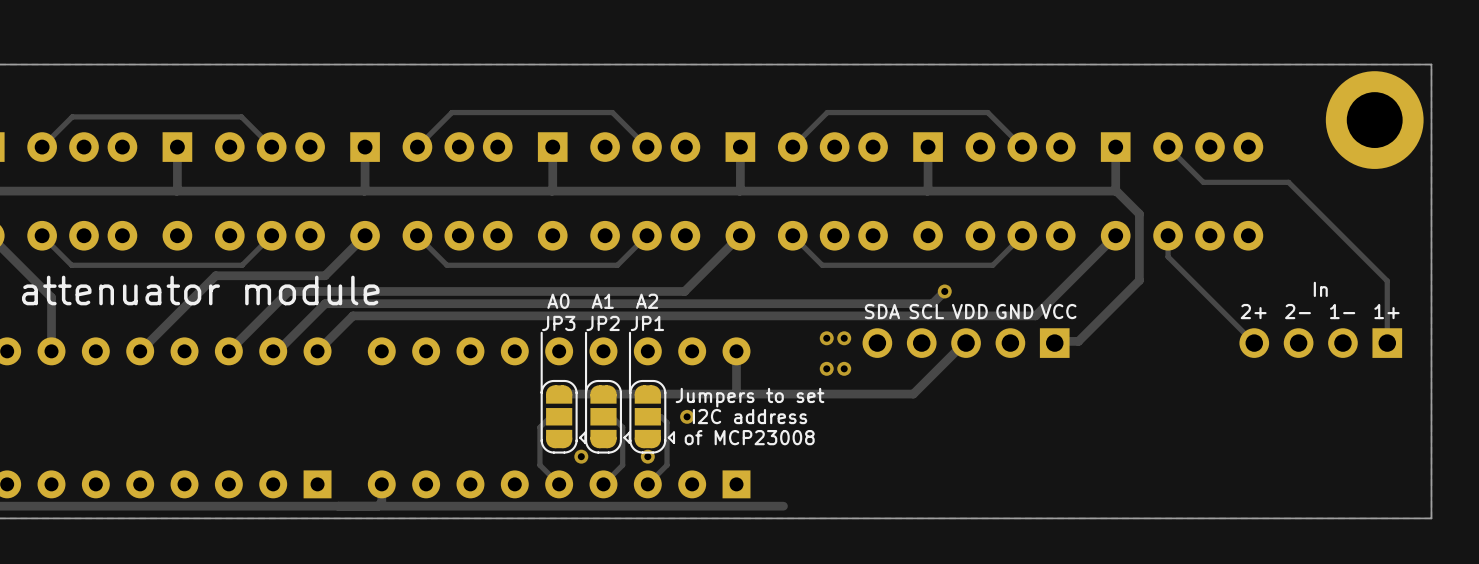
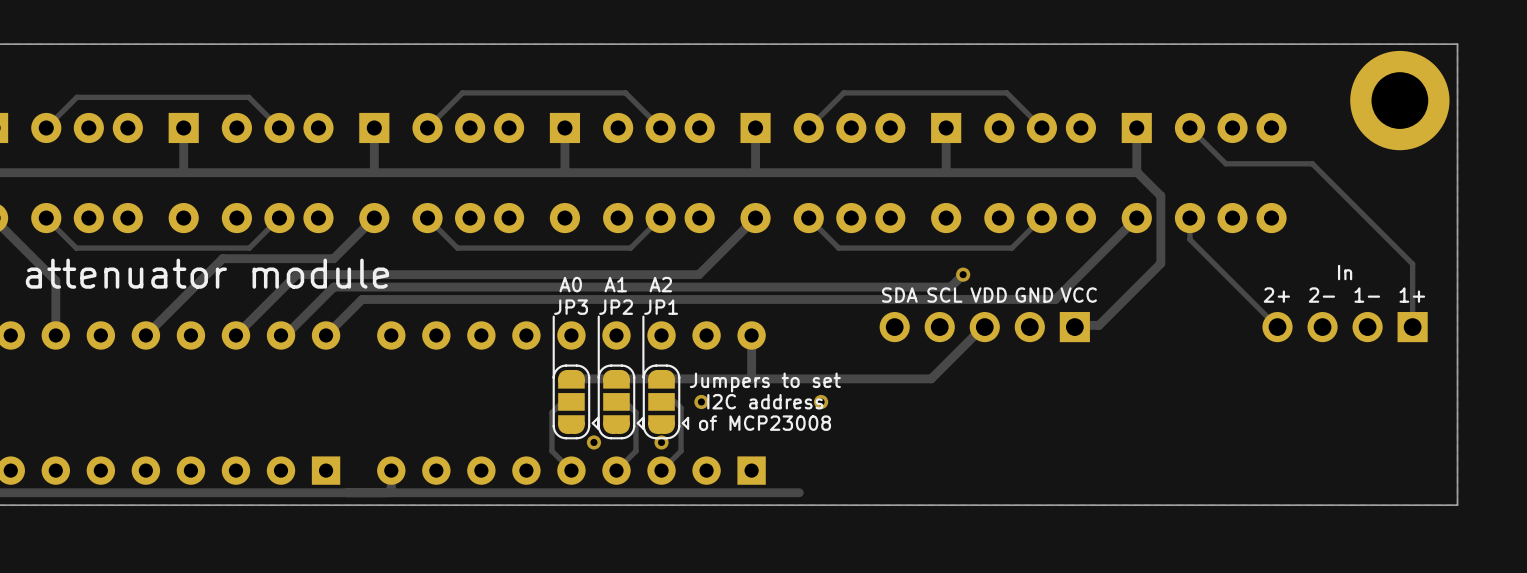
via: (826, 338) -> none
via: (844, 338) -> none
via: (826, 368) -> none
via: (844, 368) -> none
via: none -> (821, 401)

